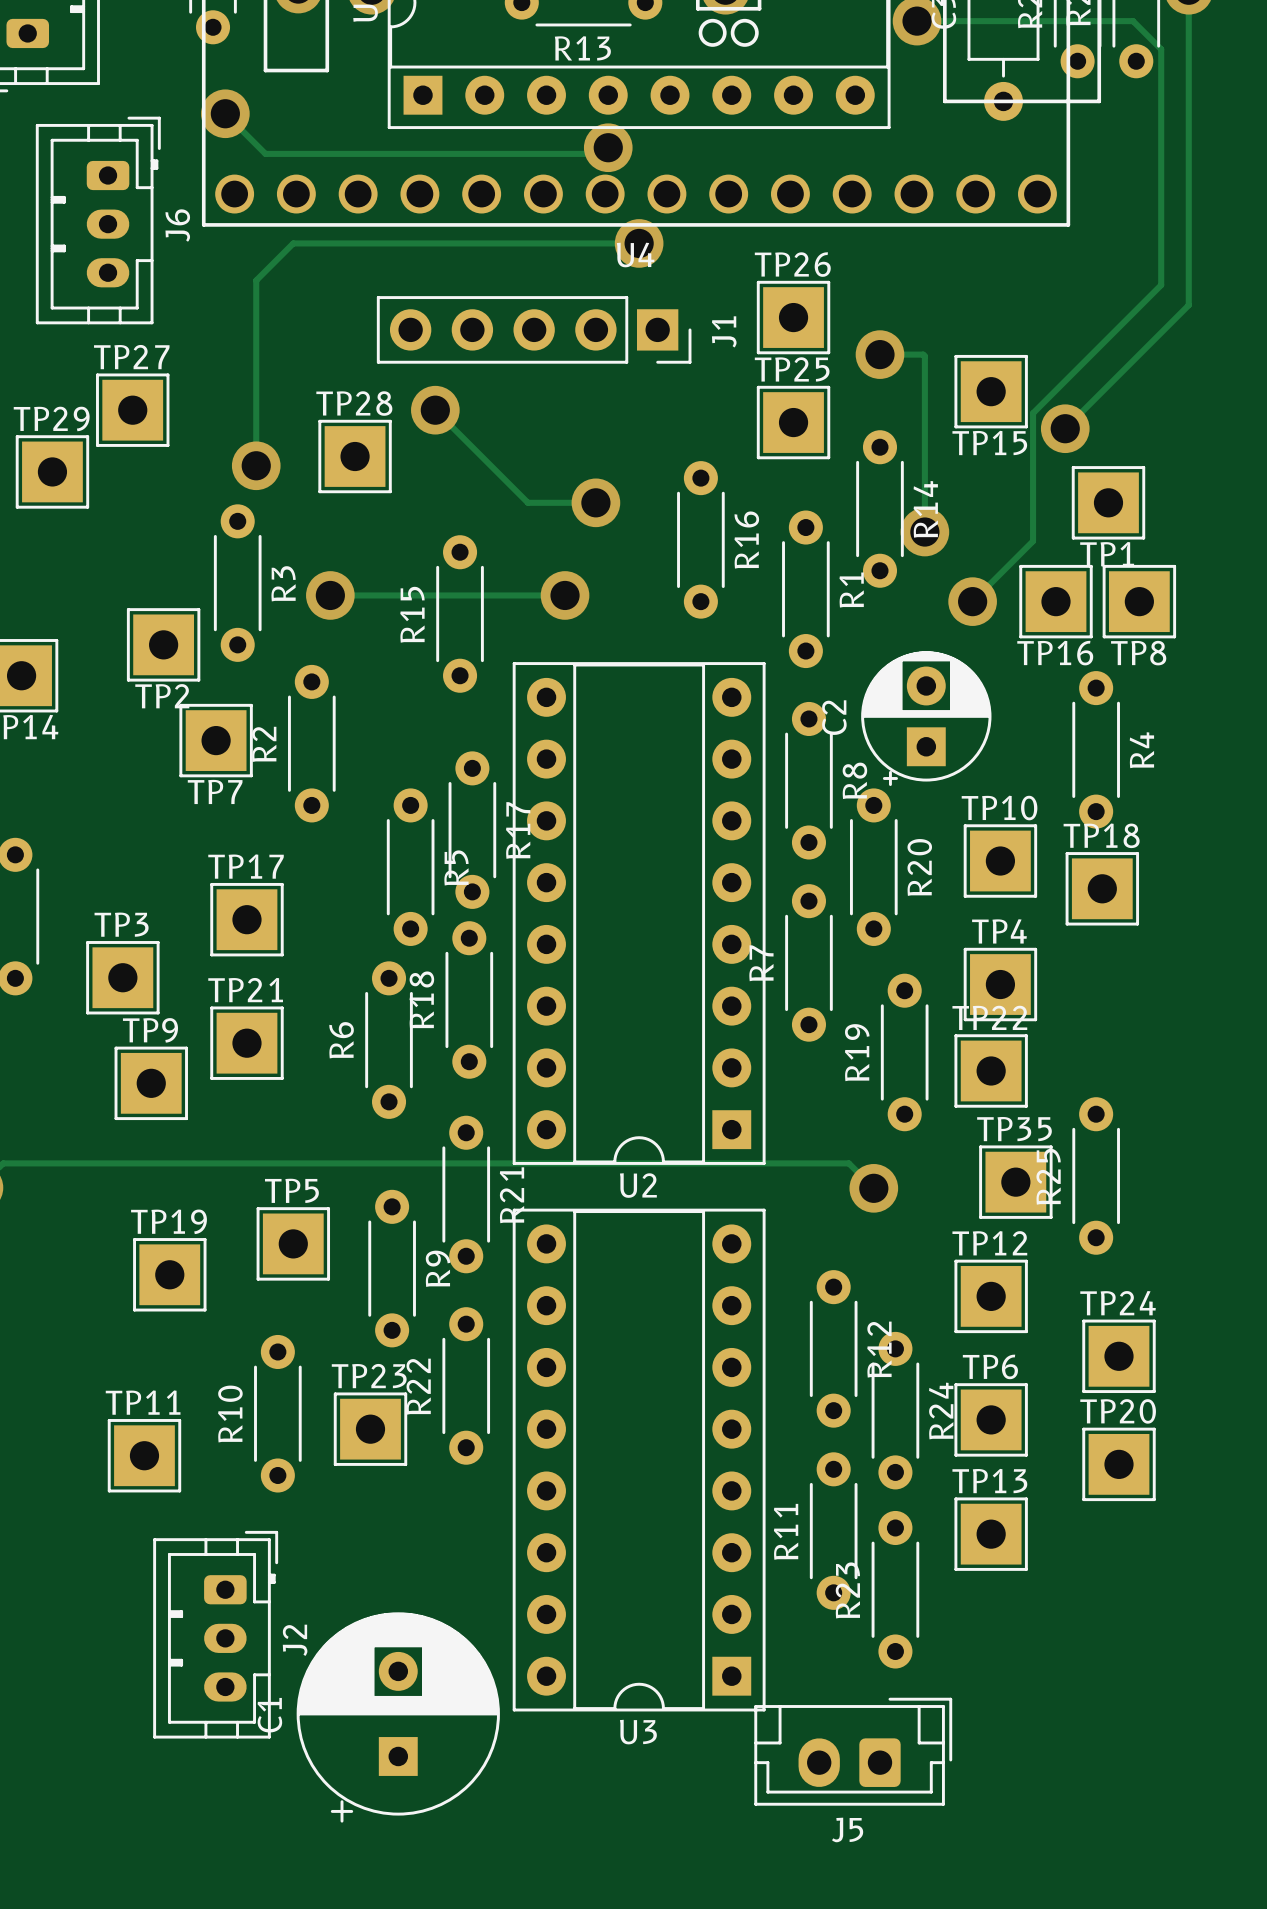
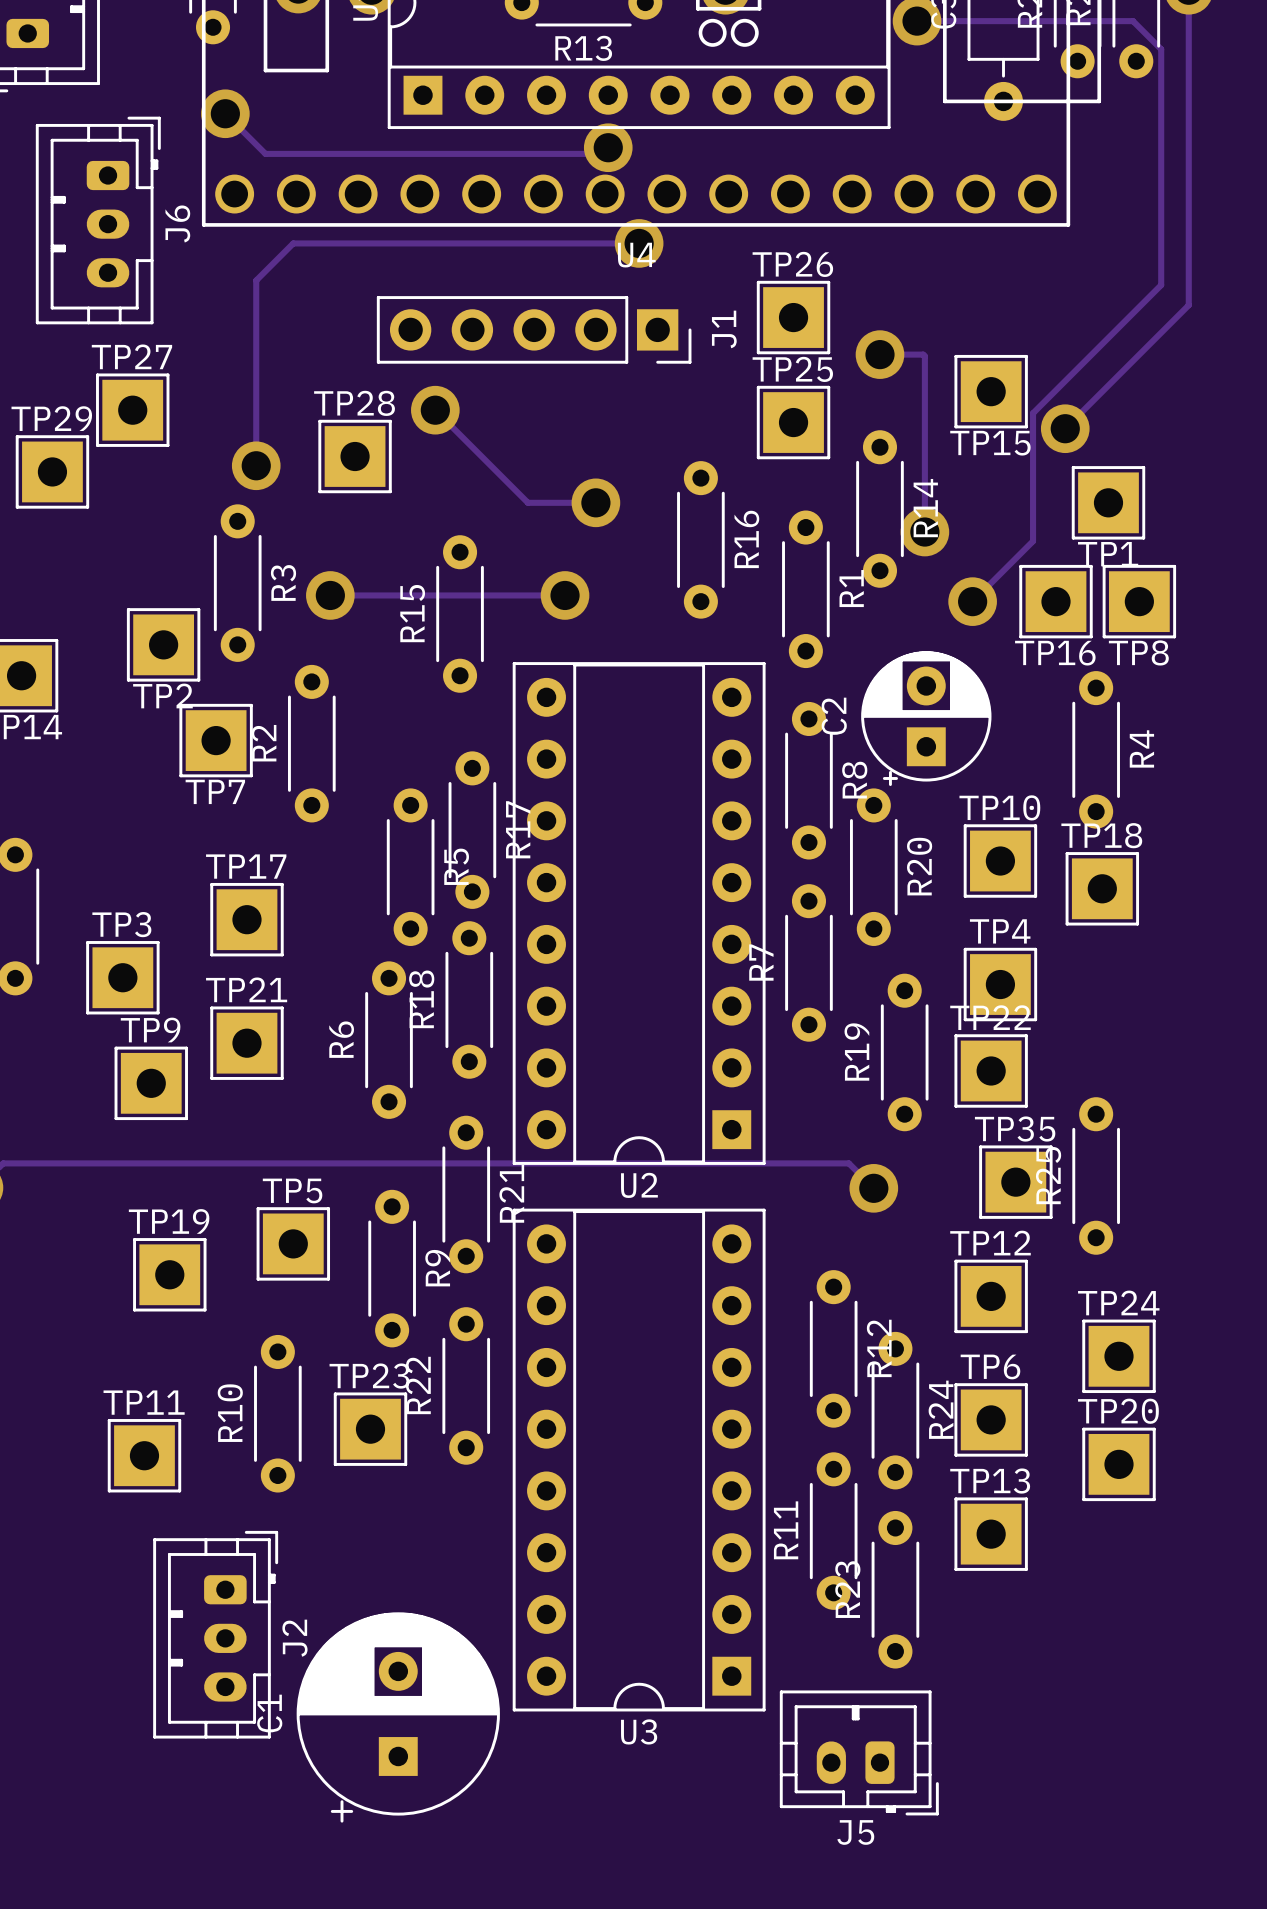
J5 footprint: [754, 1697, 953, 1806] -> [779, 1690, 939, 1816]

